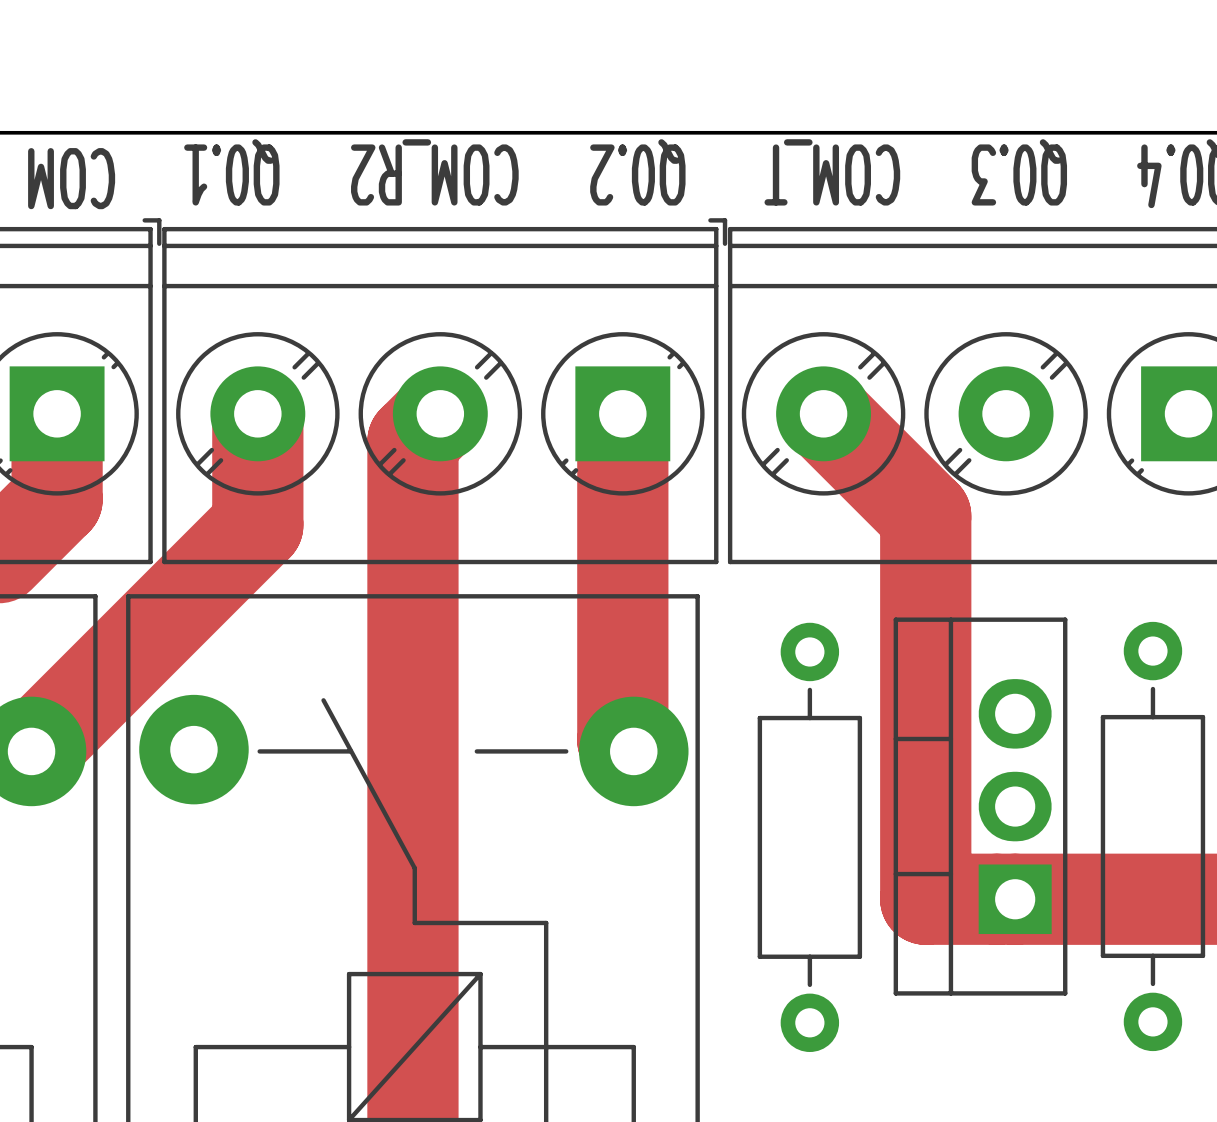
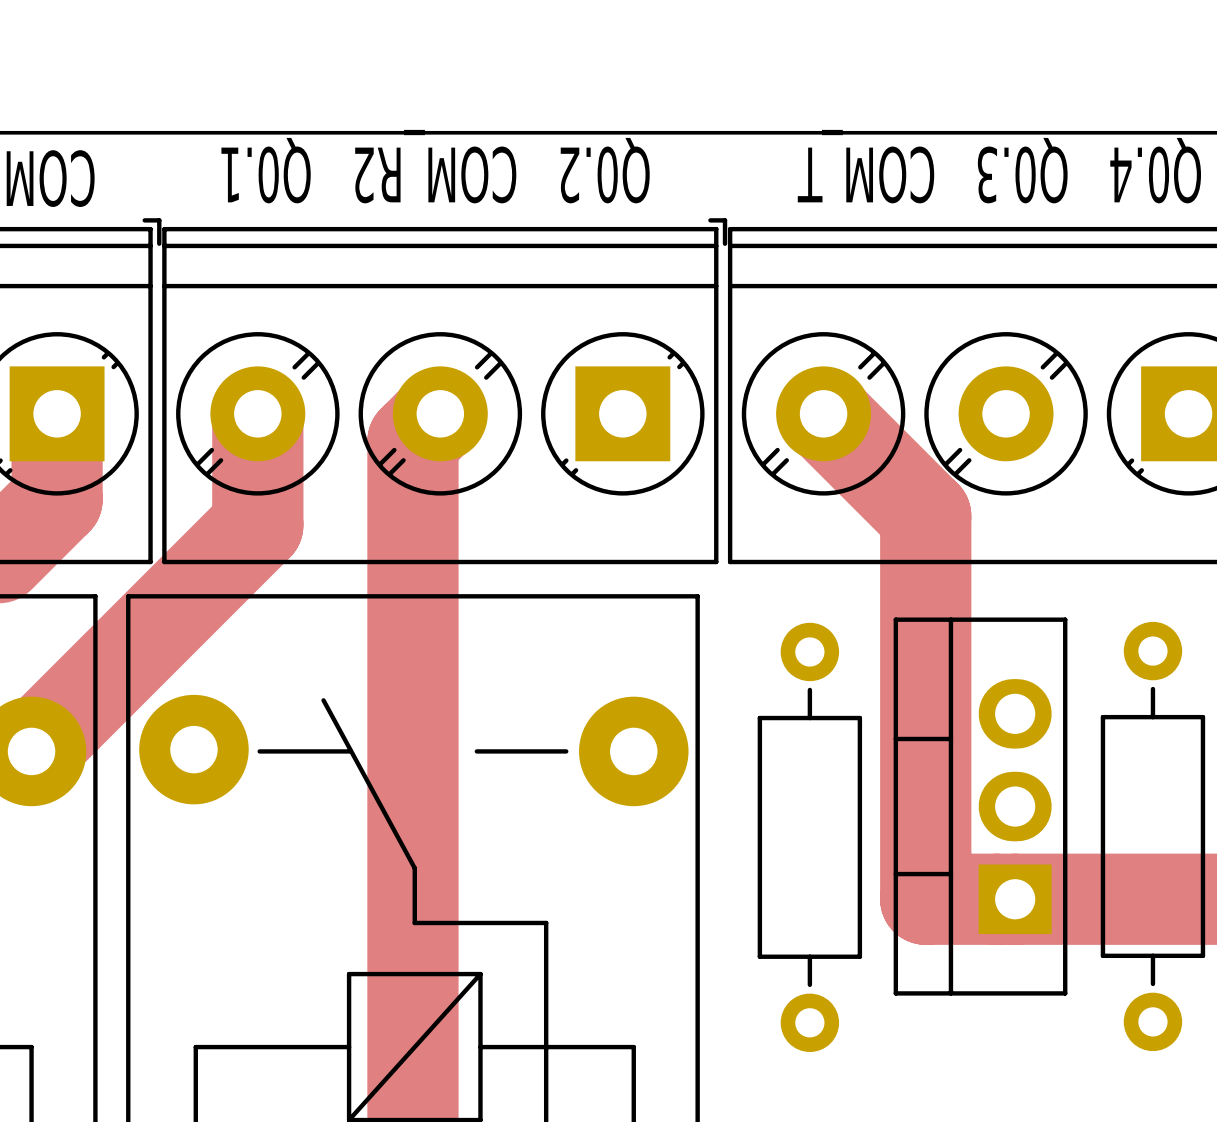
track: (622, 413) (622, 740) (633, 751) -> none

